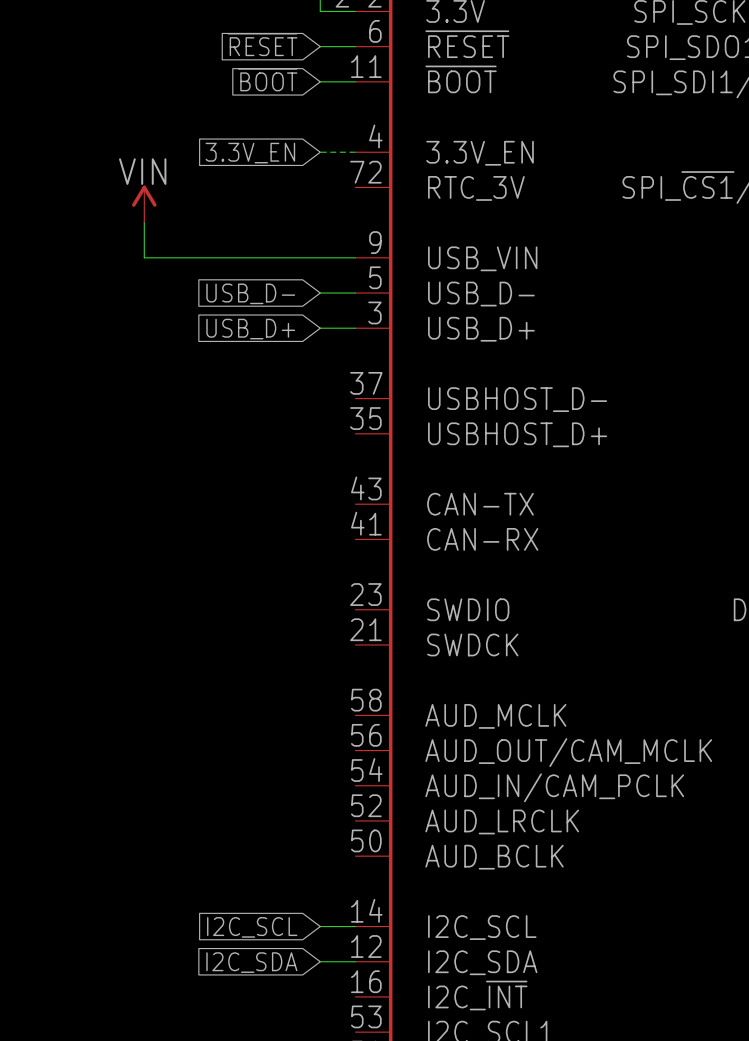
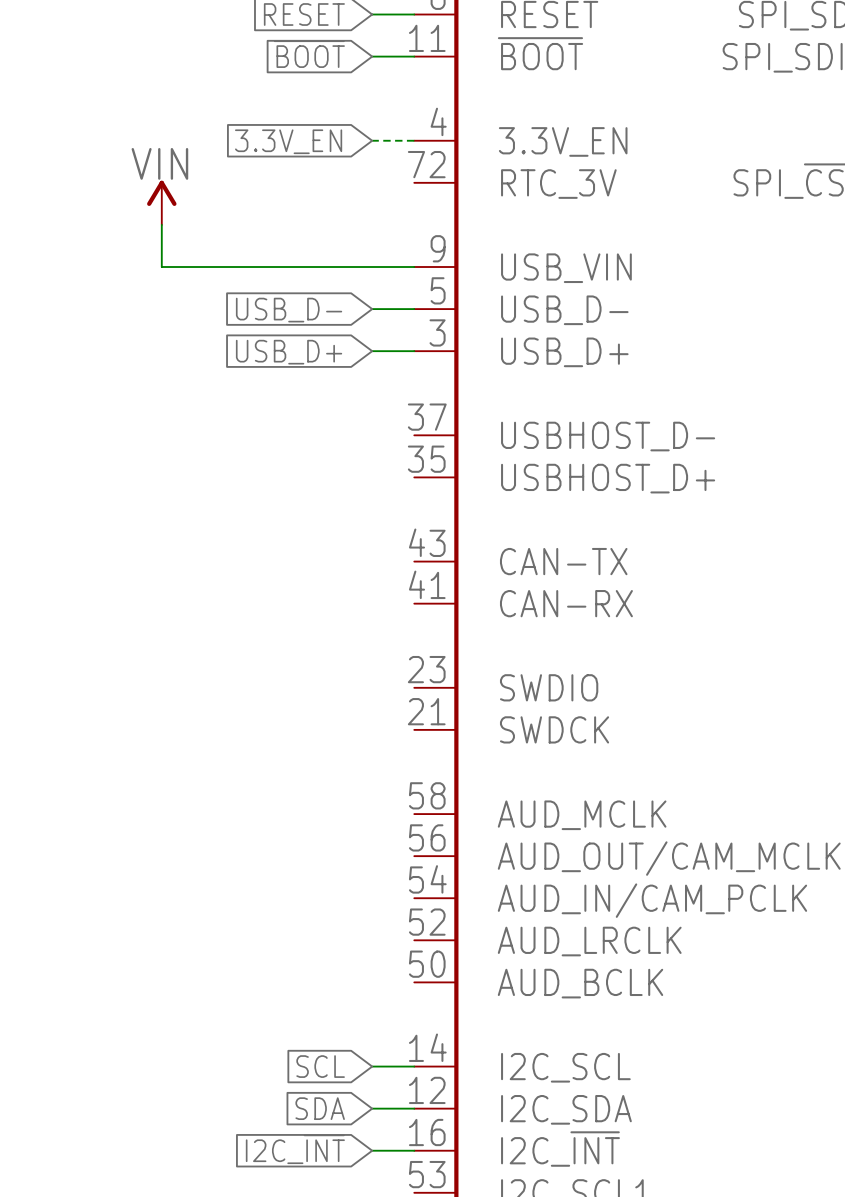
global label: I2C_SCL (252, 927) -> SCL (320, 1066)
global label: I2C_SDA (251, 962) -> SDA (320, 1108)
global label: none -> I2C_~{INT} (295, 1149)
wire: none -> (372, 1150) (414, 1150)

